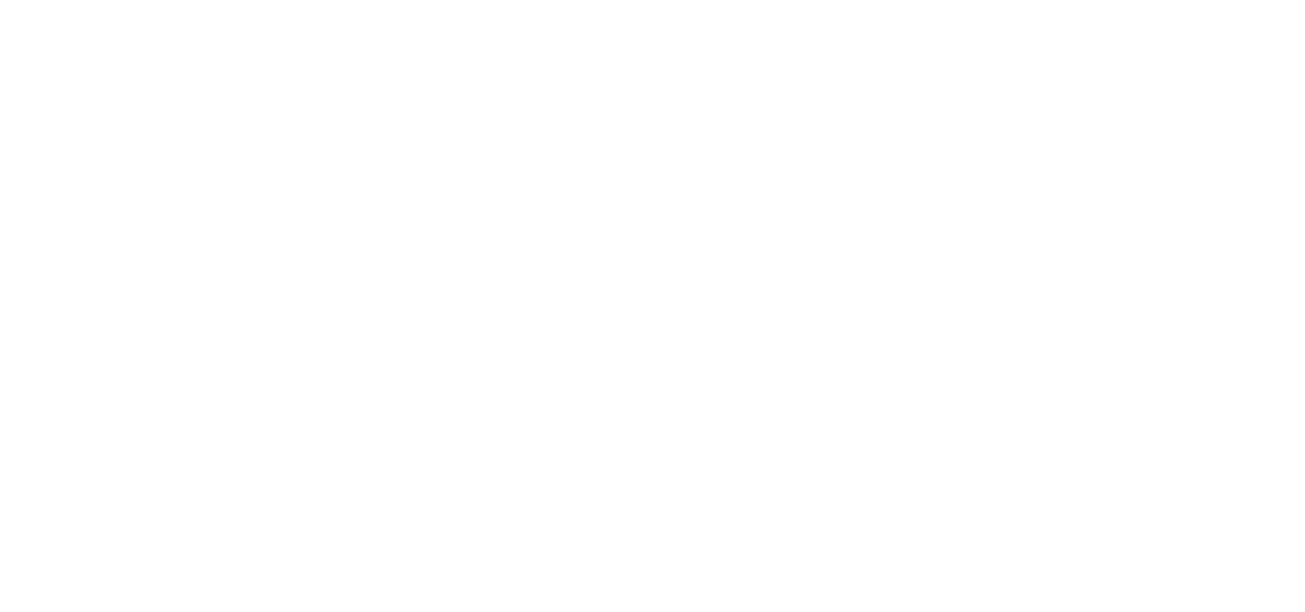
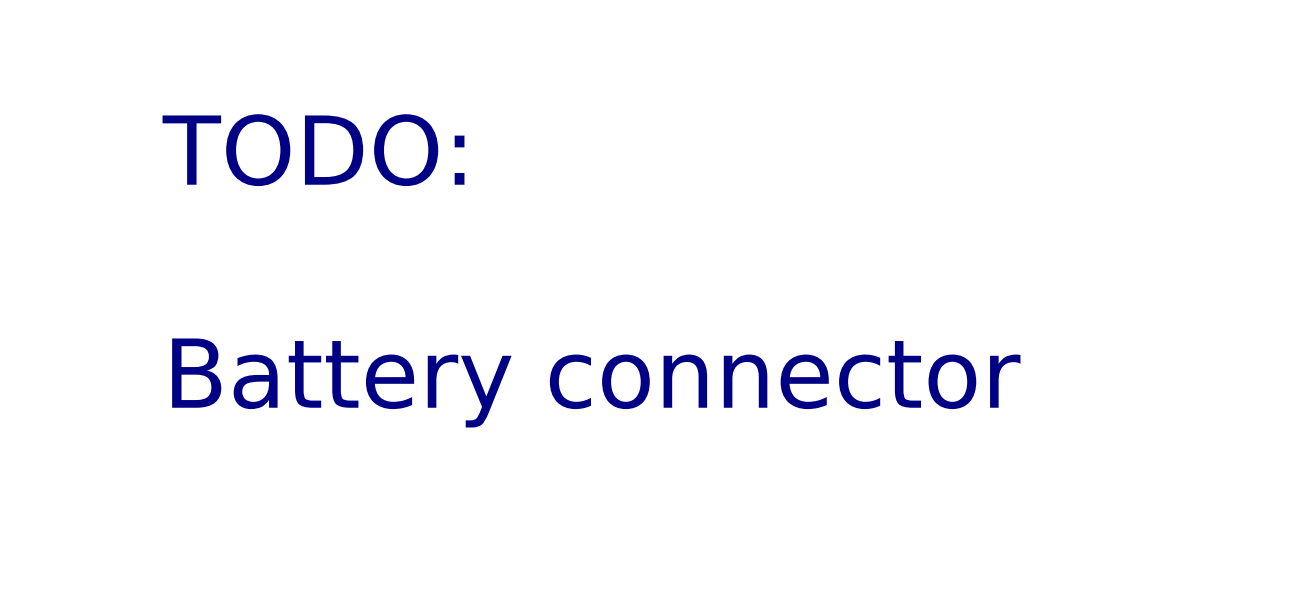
text: none -> TODO: (313, 150)
text: none -> Battery connector (596, 382)

